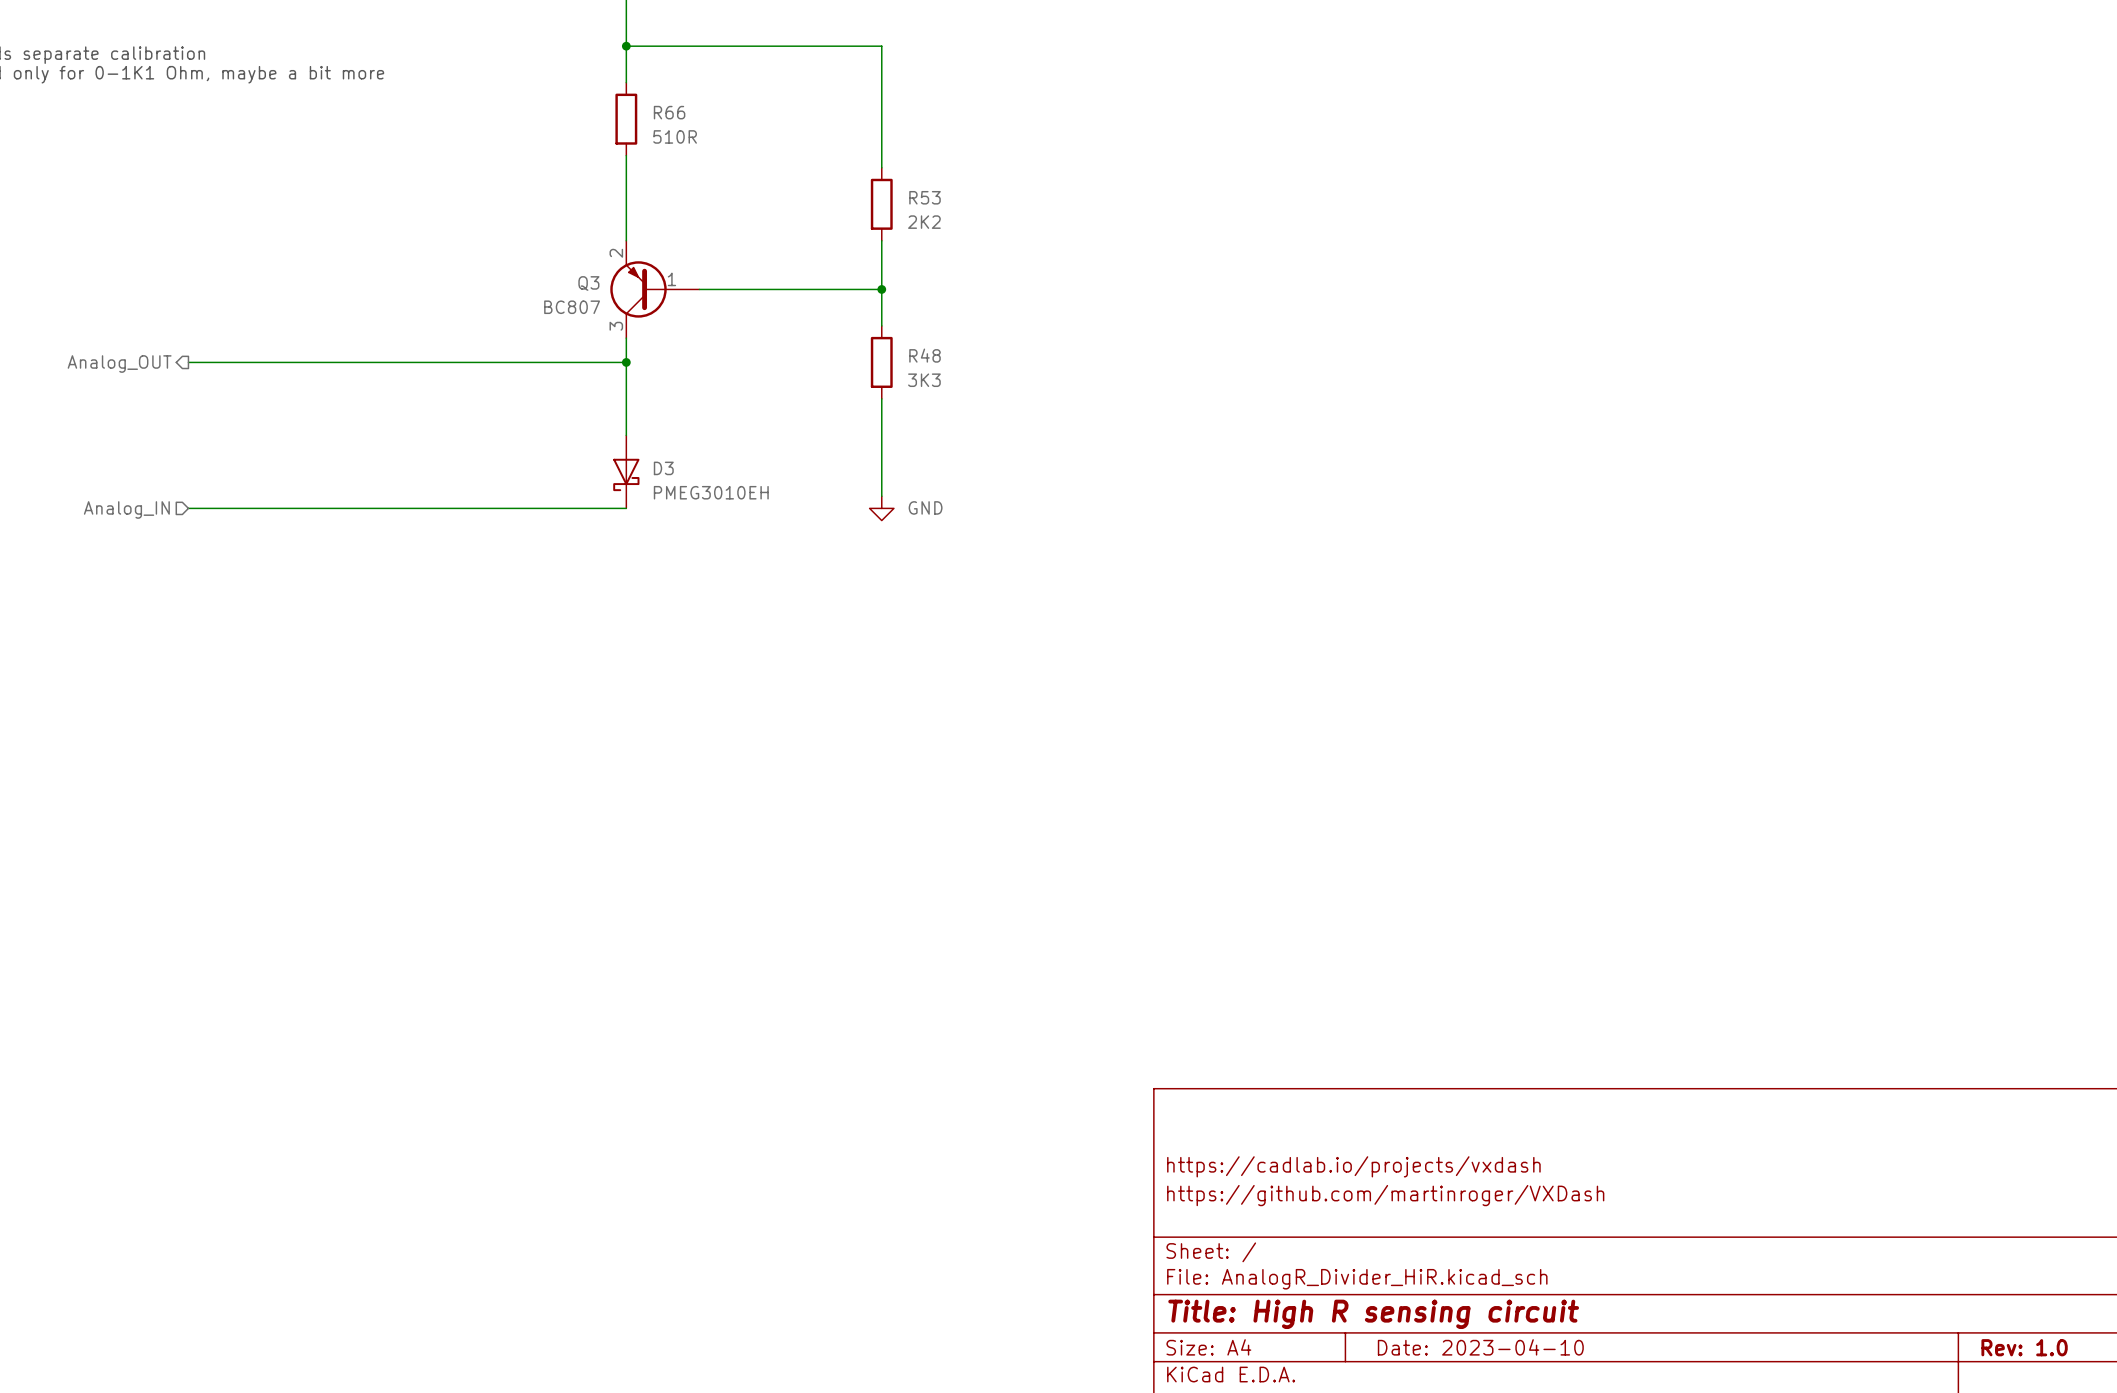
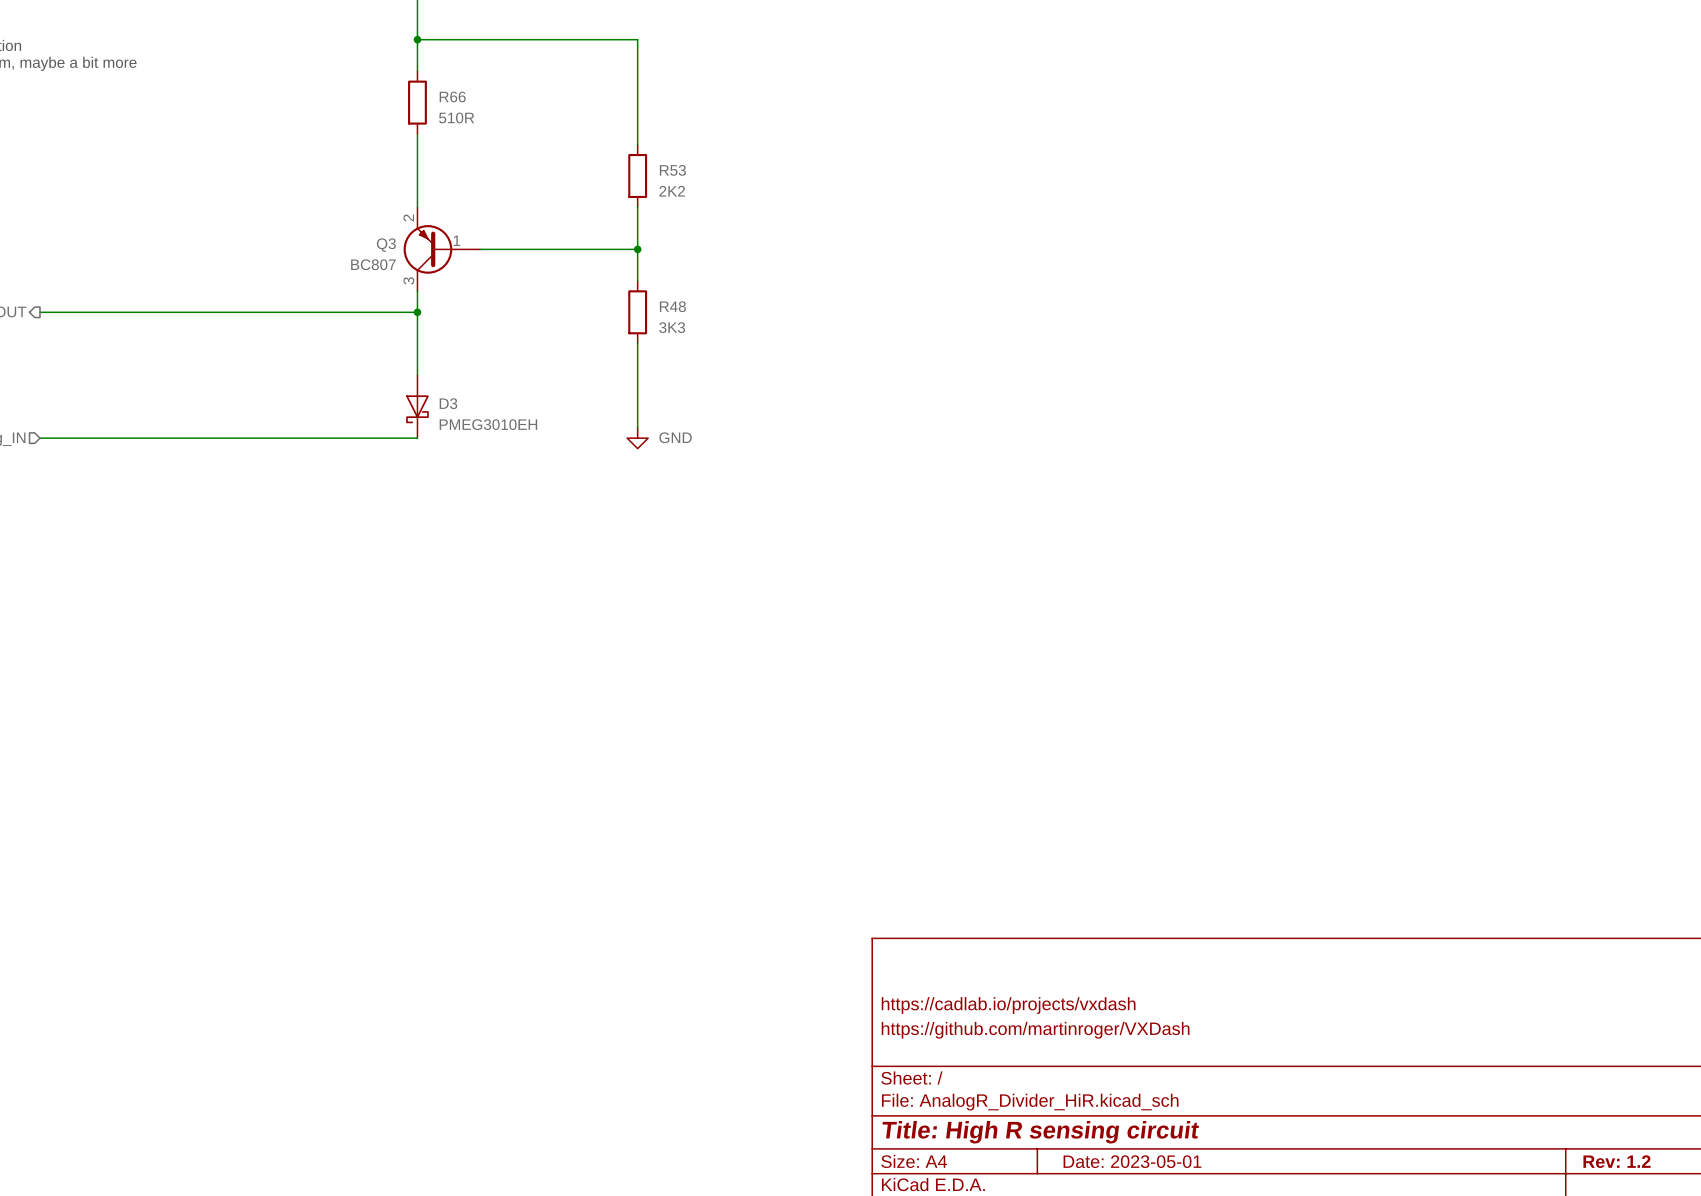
title block: Date: 2023-04-10 (1480, 1347) -> Date: 2023-05-01 (1132, 1161)
title block: Rev: 1.0 (2024, 1347) -> Rev: 1.2 (1617, 1161)

